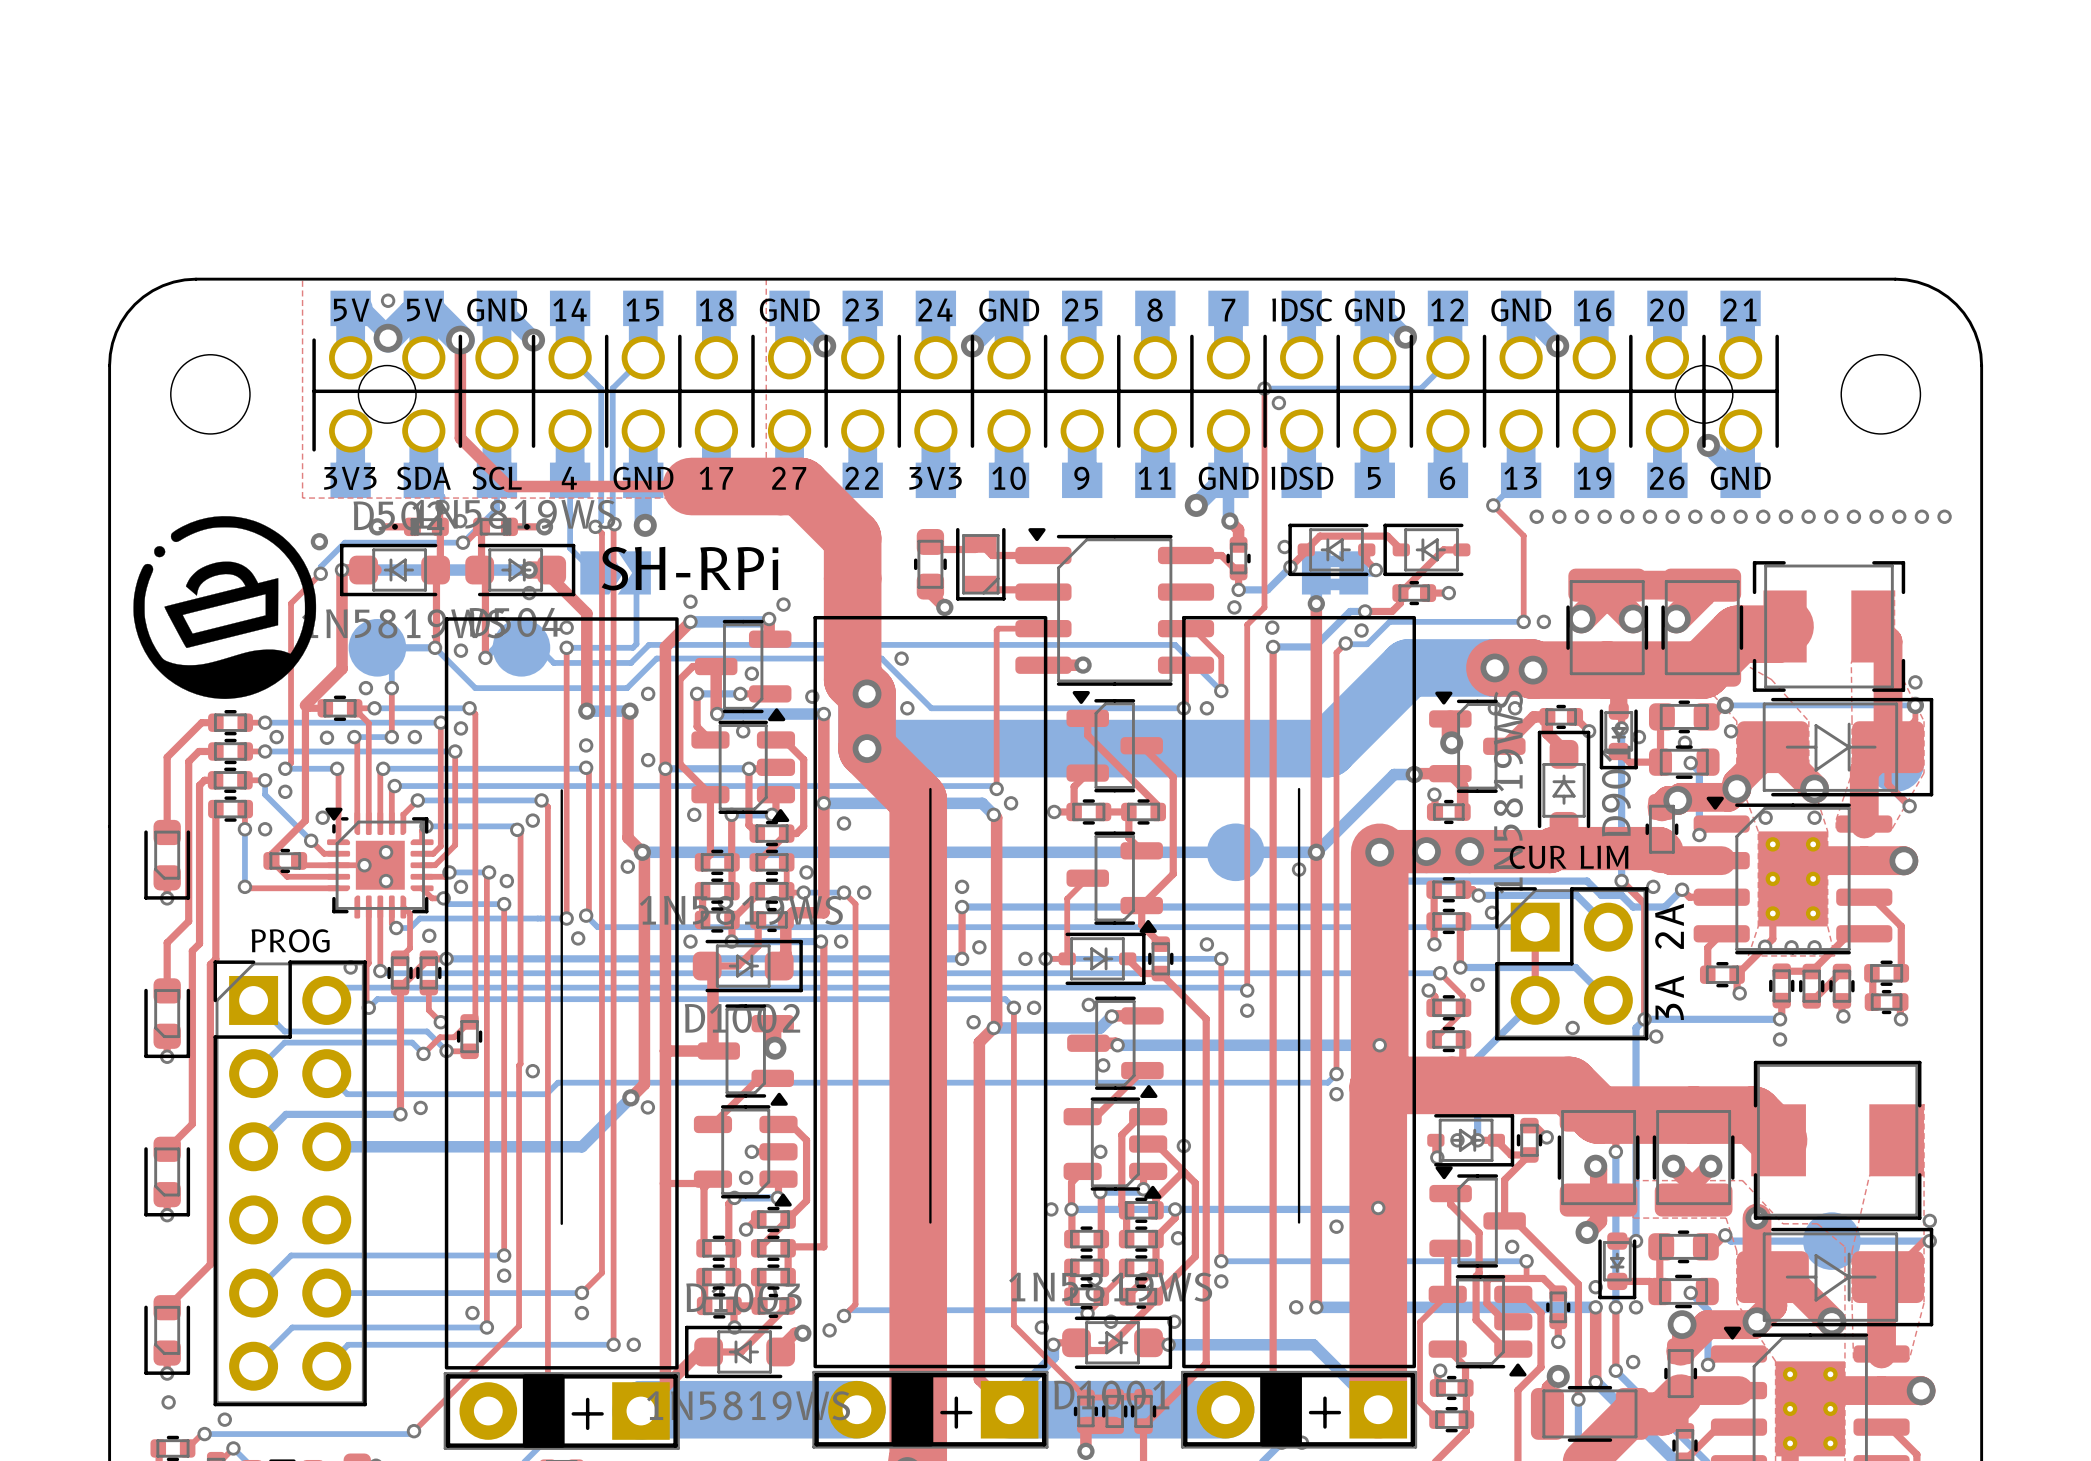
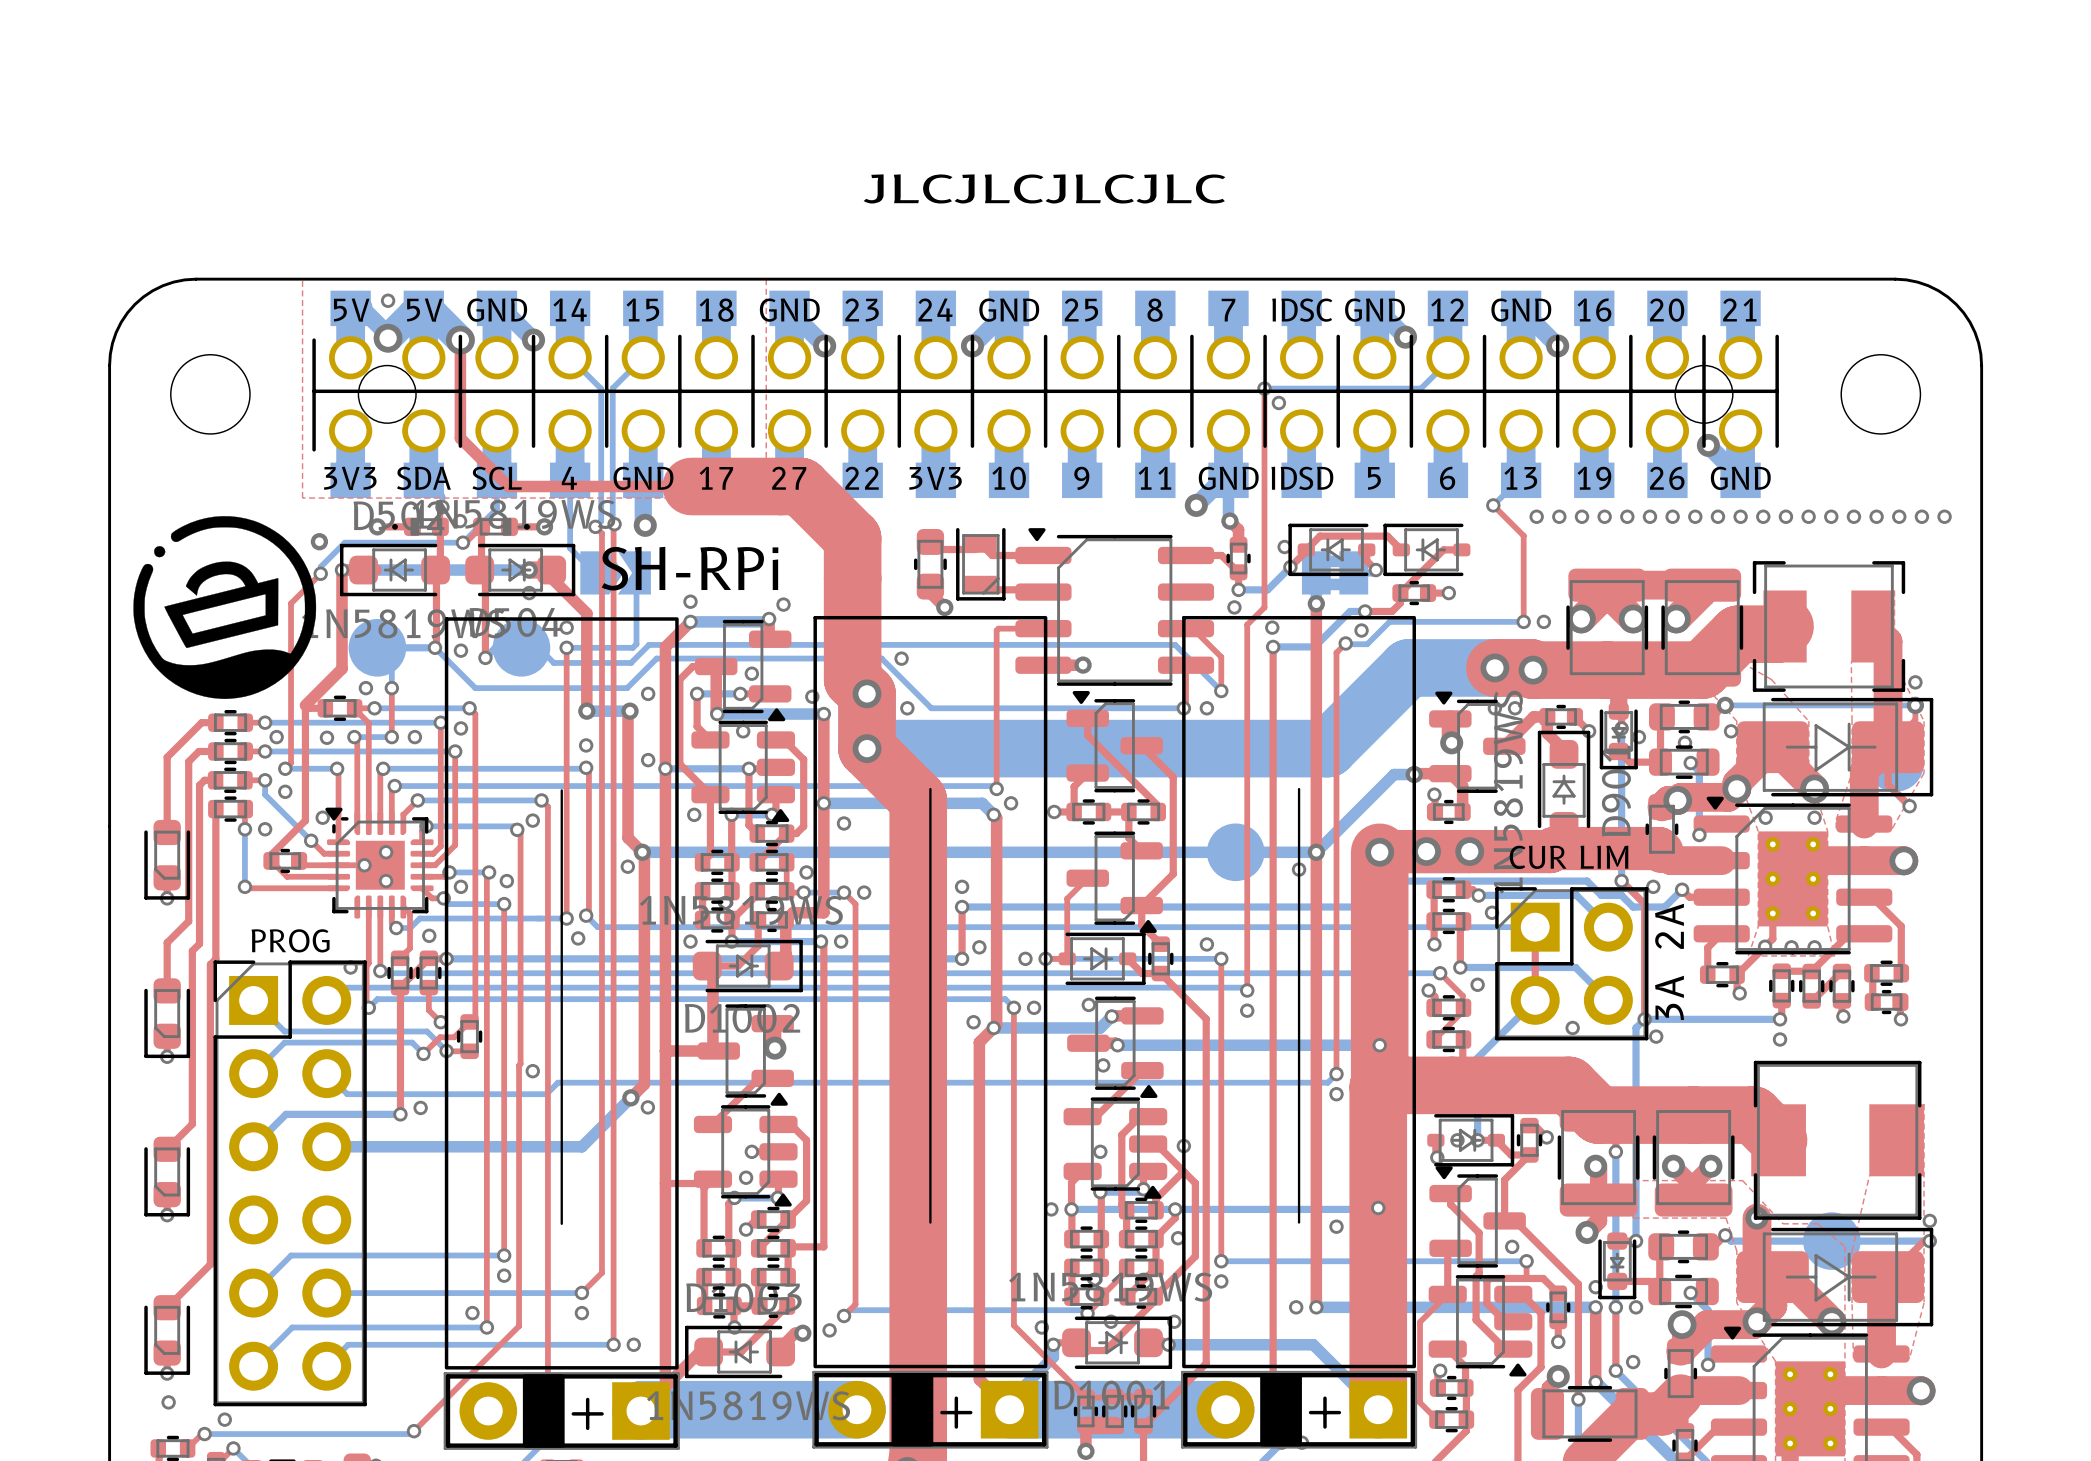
text: none -> JLCJLCJLCJLC (1044, 188)

